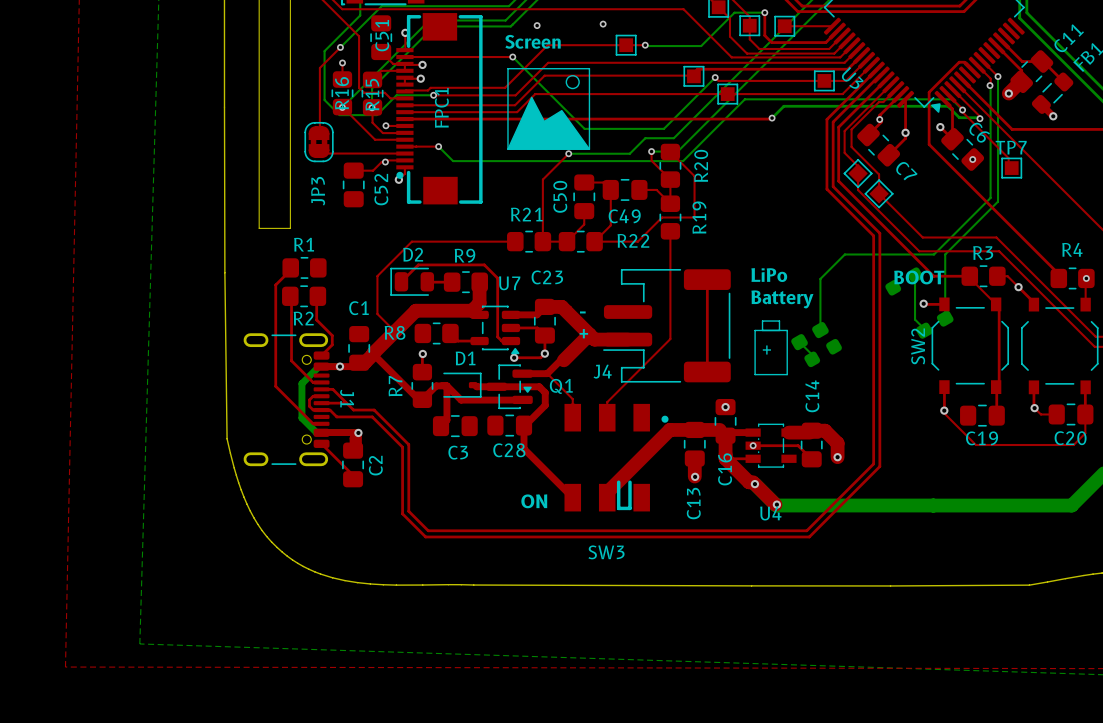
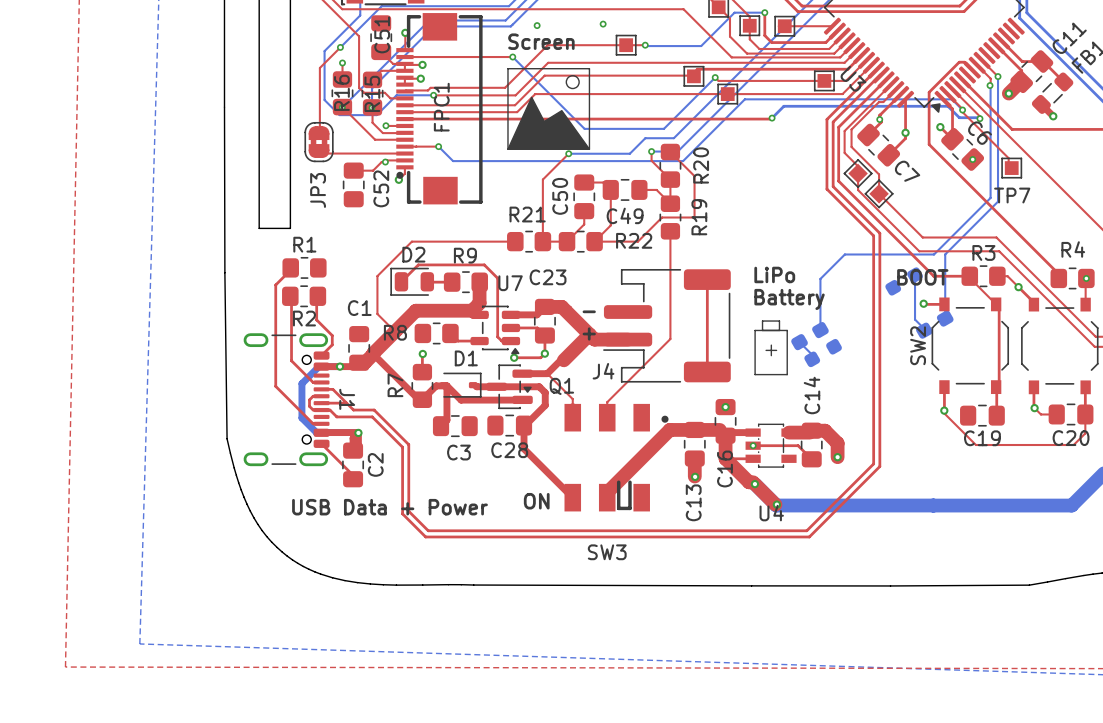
TP7 name position: TP7 (1011, 147) -> TP7 (1012, 195)
text: none -> USB Data + Power (390, 507)

